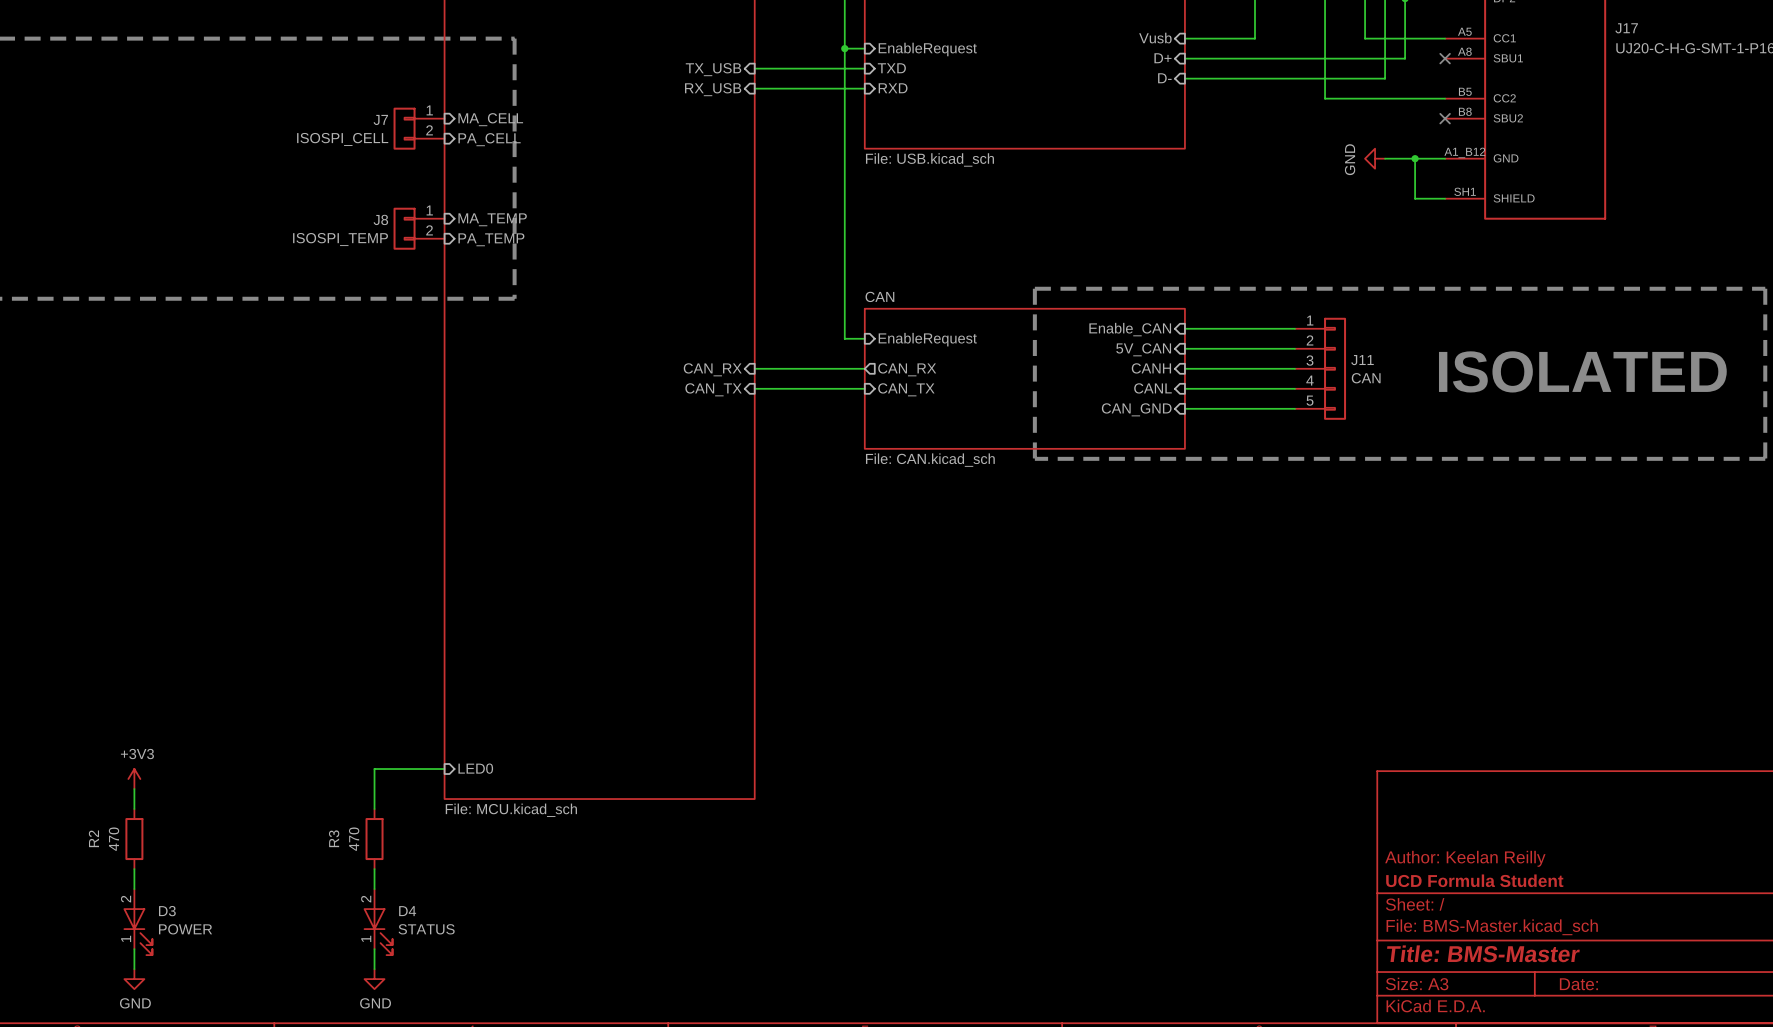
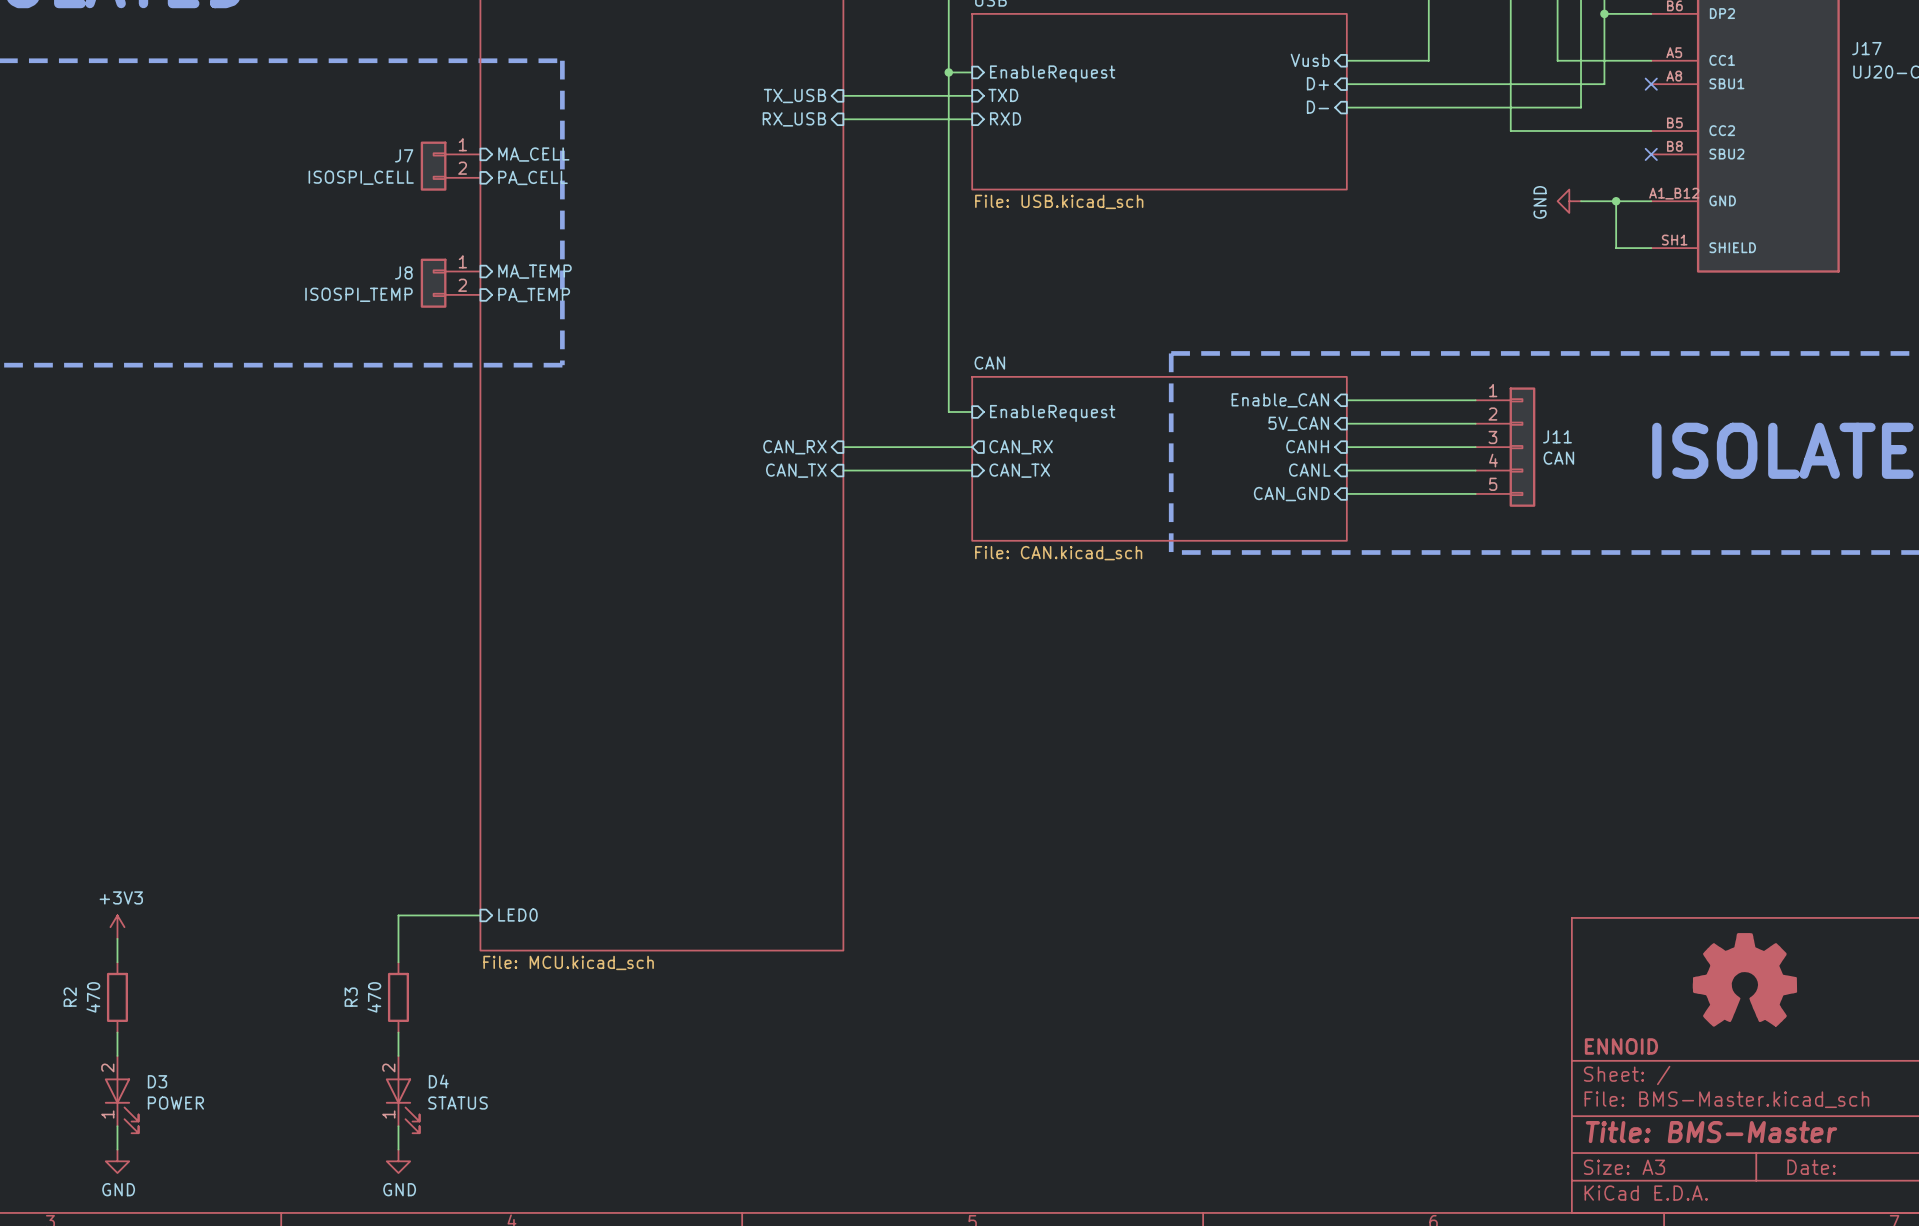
part: none -> (1744, 979)
title block: Author: Keelan Reilly (1465, 858) -> none
title block: UCD Formula Student (1474, 880) -> ENNOID (1621, 1046)

